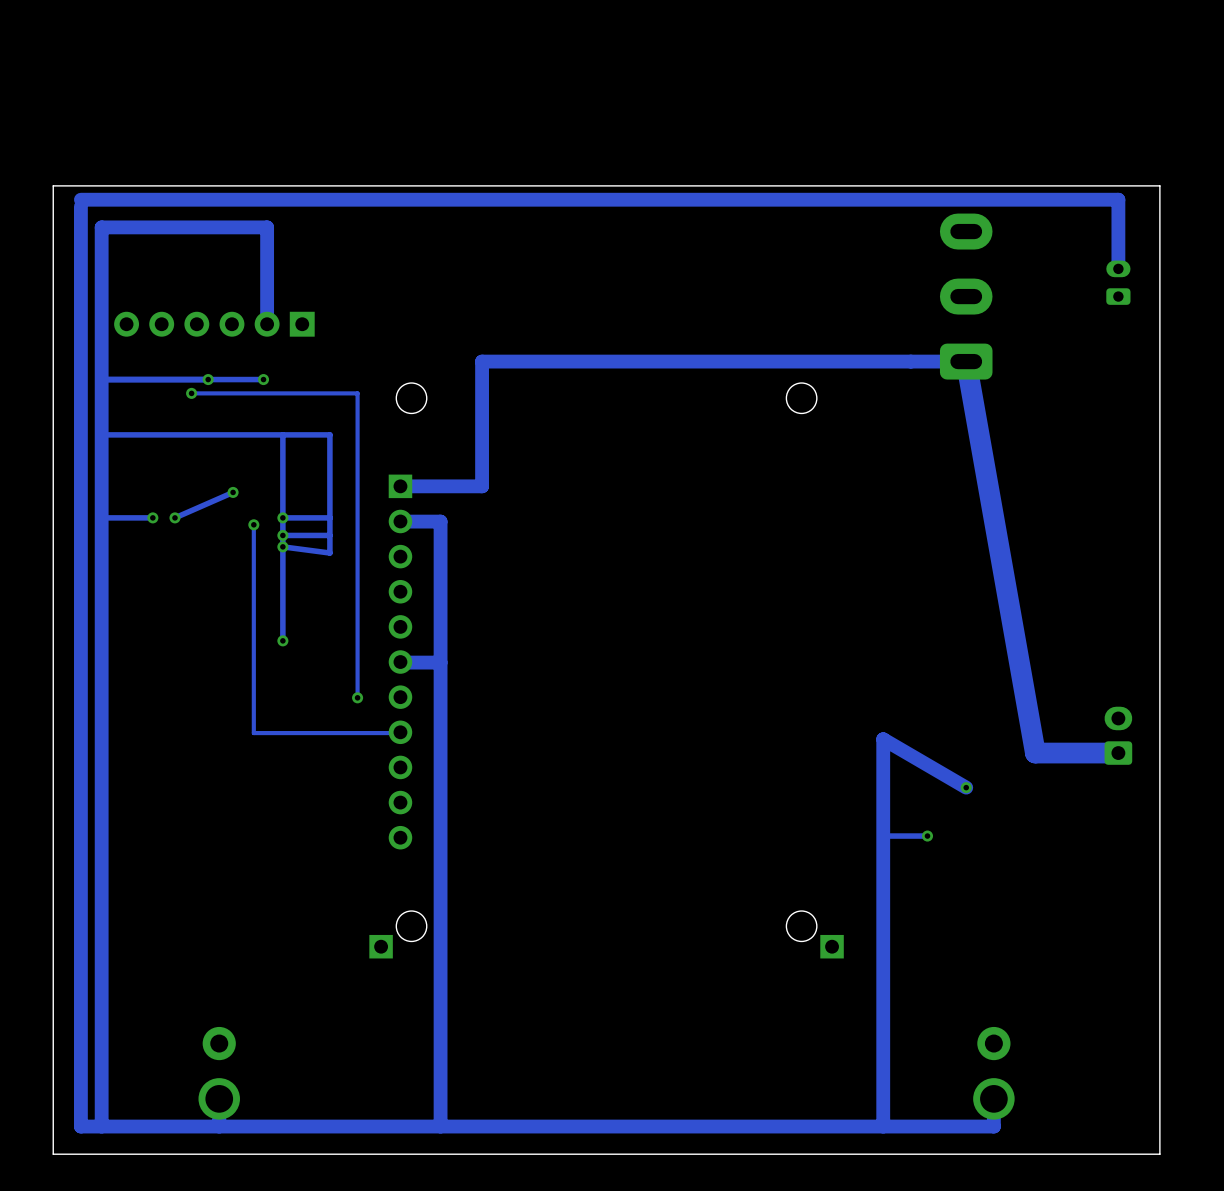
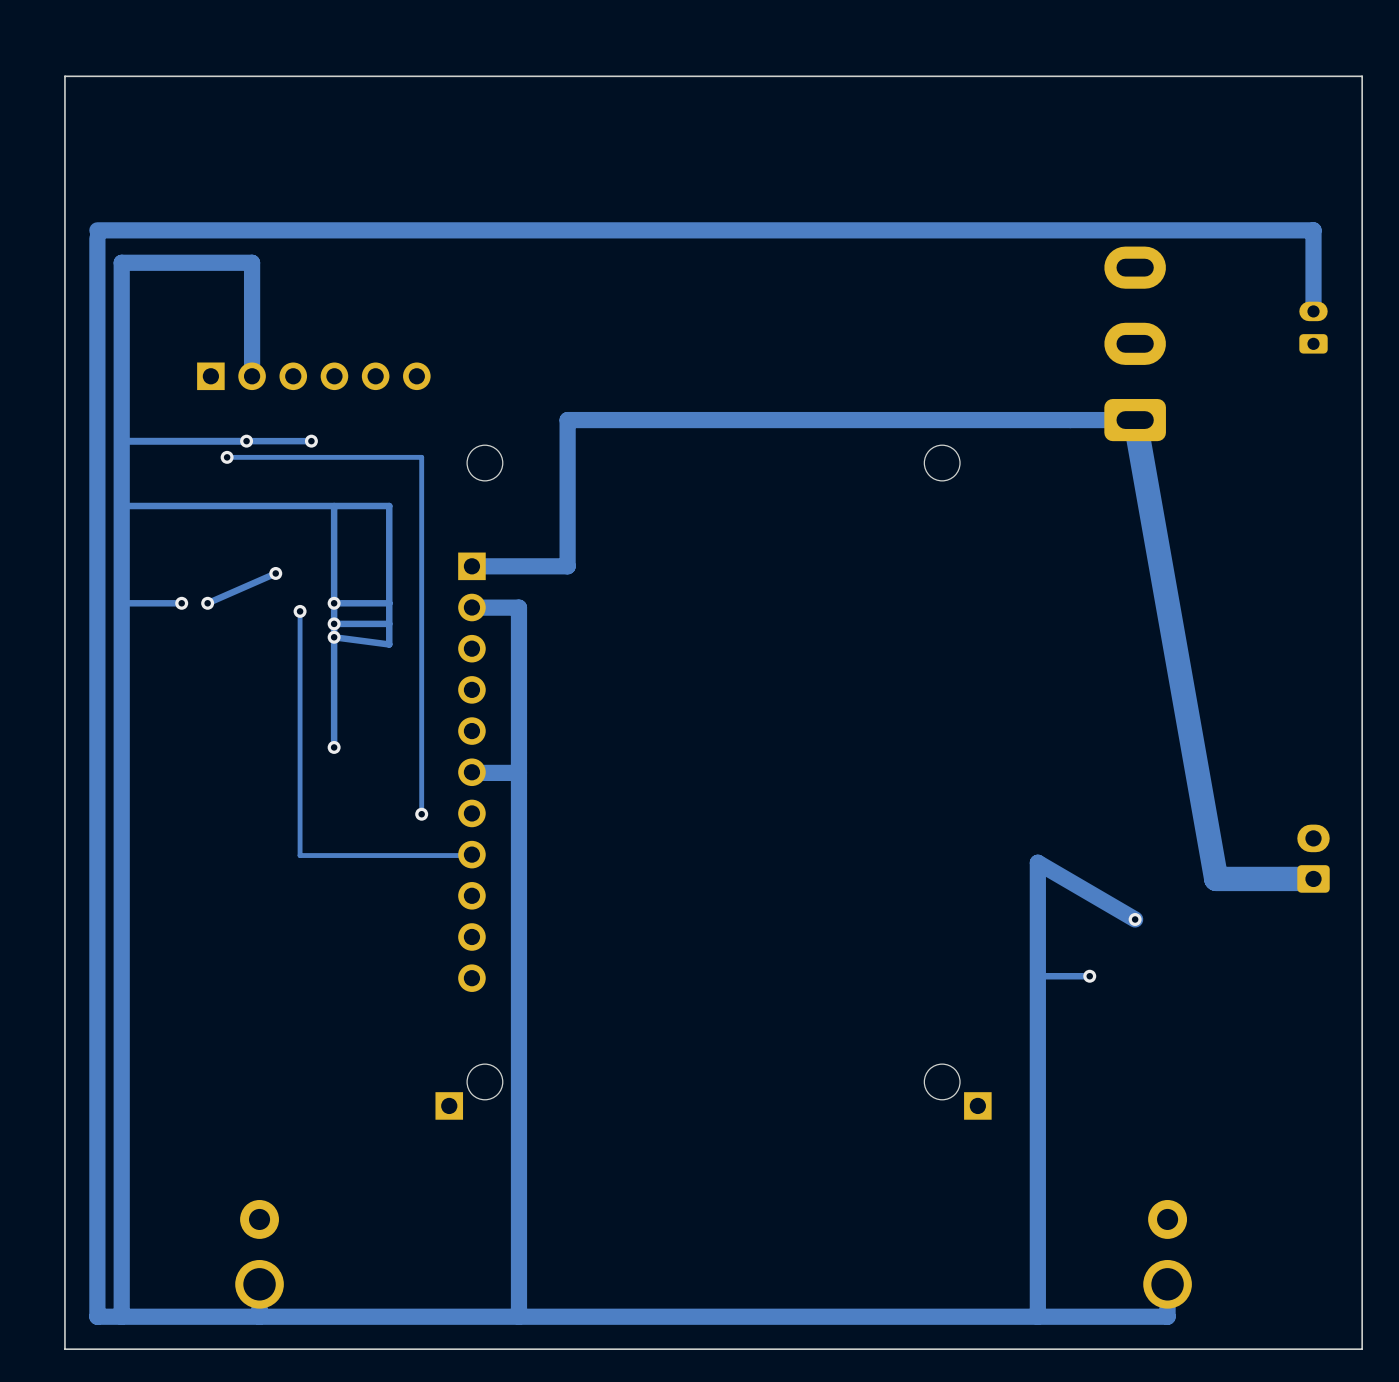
board edge: (1159, 185) (53, 185) -> (1362, 214) (1362, 76) (64, 76) (64, 214)
track: (212, 227) (267, 227) (267, 324) -> (252, 262) (252, 376)
part: (214, 324) -> none
part: none -> (313, 376)

